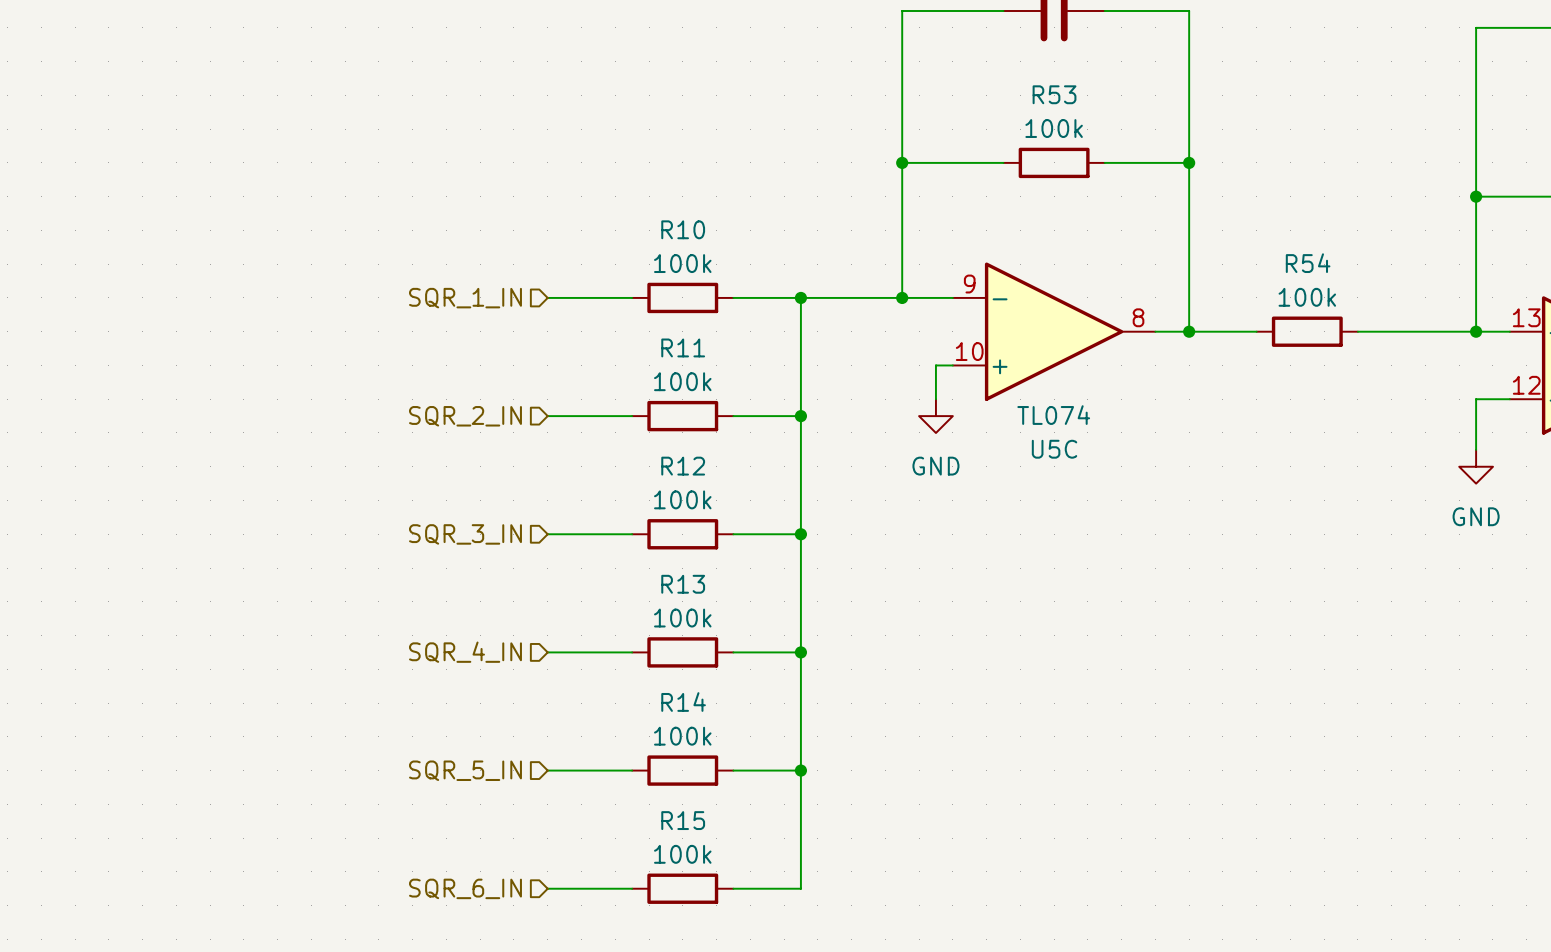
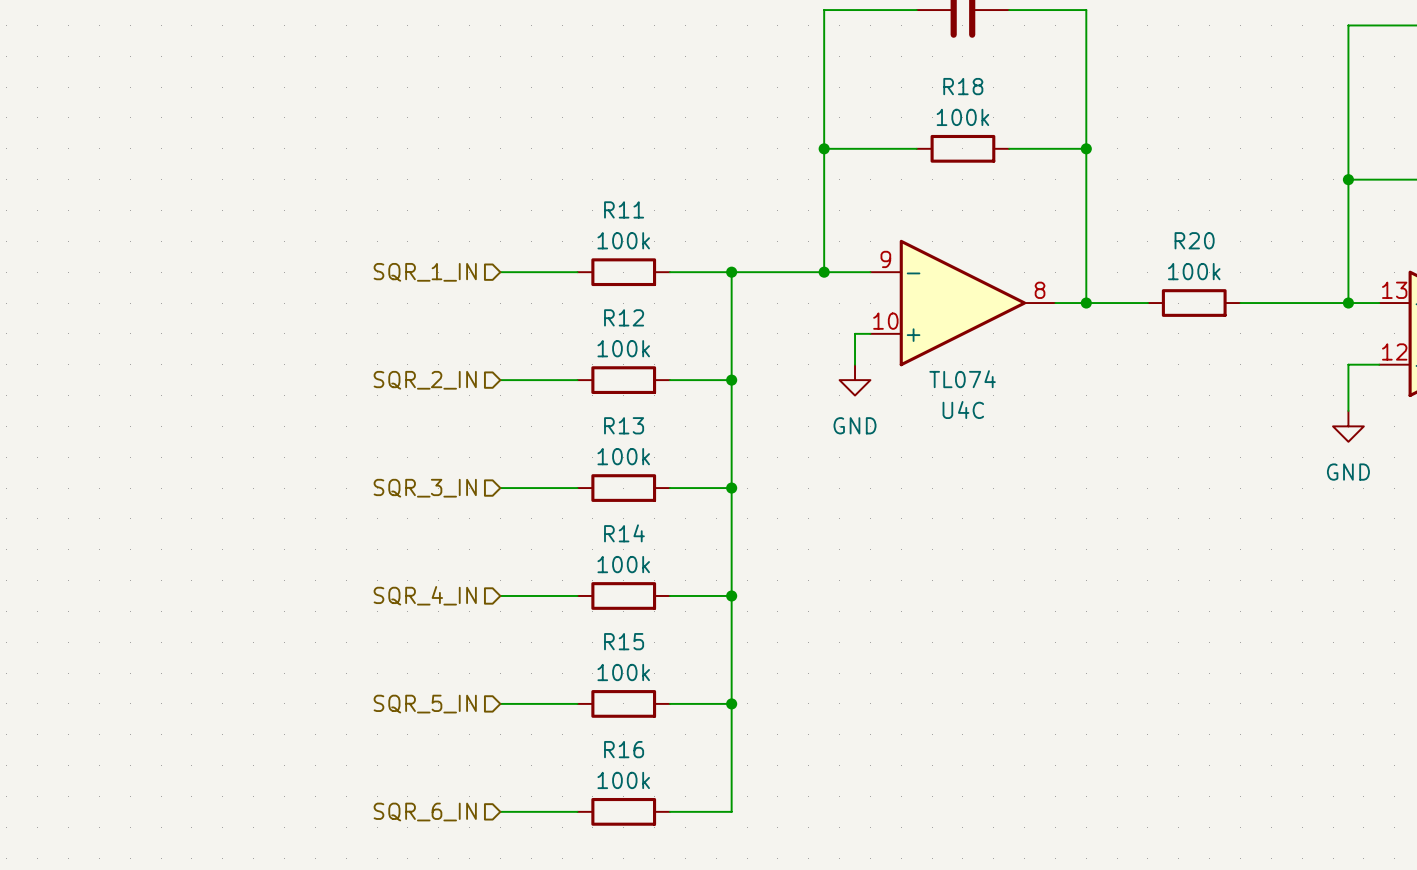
R53 name: R53 (1054, 94) -> R18 (963, 86)
R10 name: R10 (683, 229) -> R11 (624, 209)
R54 name: R54 (1308, 263) -> R20 (1194, 240)
R11 name: R11 (683, 347) -> R12 (624, 317)
U5C name: U5C (1054, 449) -> U4C (963, 410)
R12 name: R12 (683, 466) -> R13 (624, 425)
R13 name: R13 (683, 584) -> R14 (624, 533)
R14 name: R14 (683, 702) -> R15 (624, 641)
R15 name: R15 (683, 820) -> R16 (624, 749)

